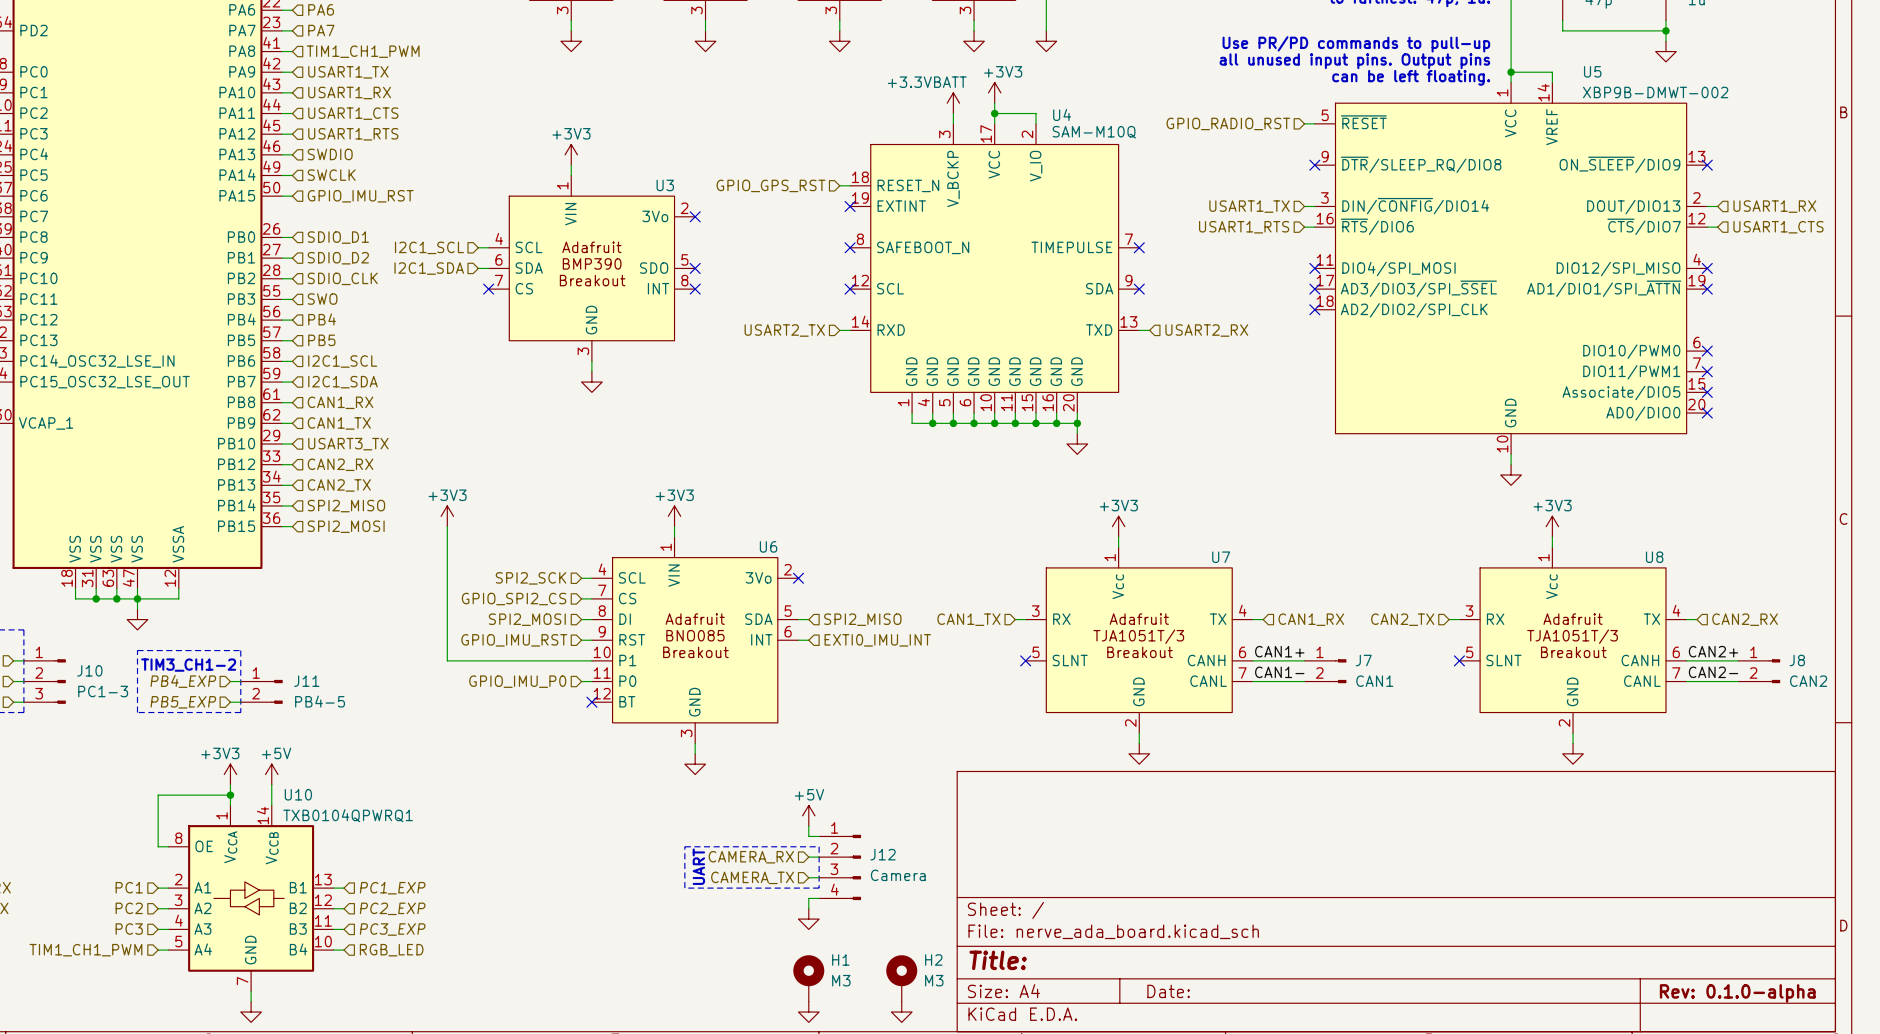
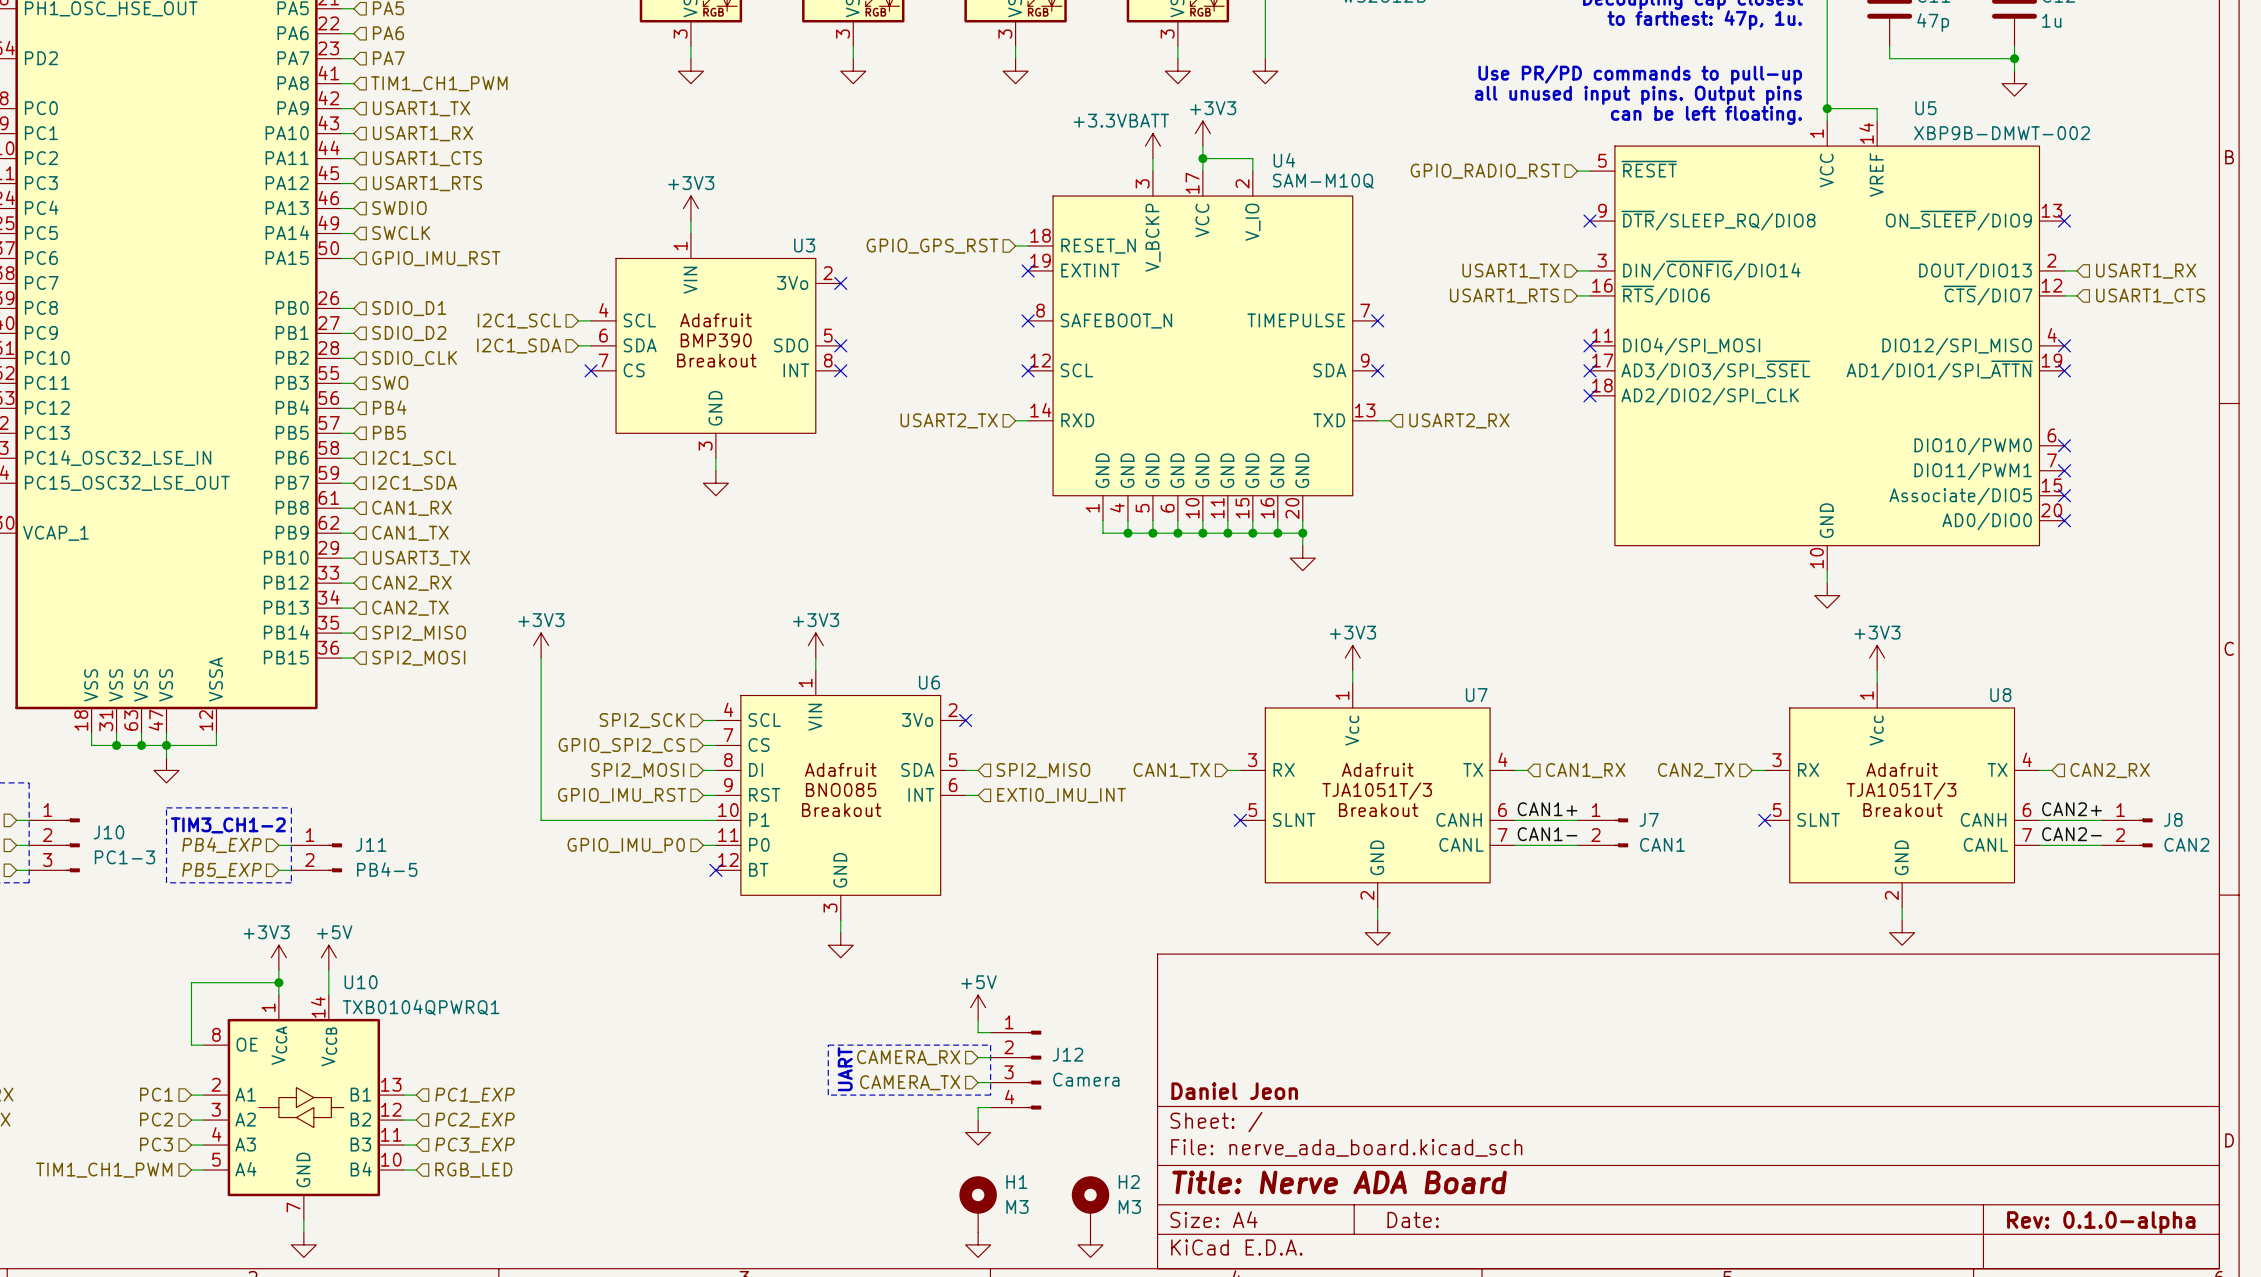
title block: none -> Daniel Jeon (1234, 1091)
title block: Title: (998, 960) -> Title: Nerve ADA Board (1339, 1182)

